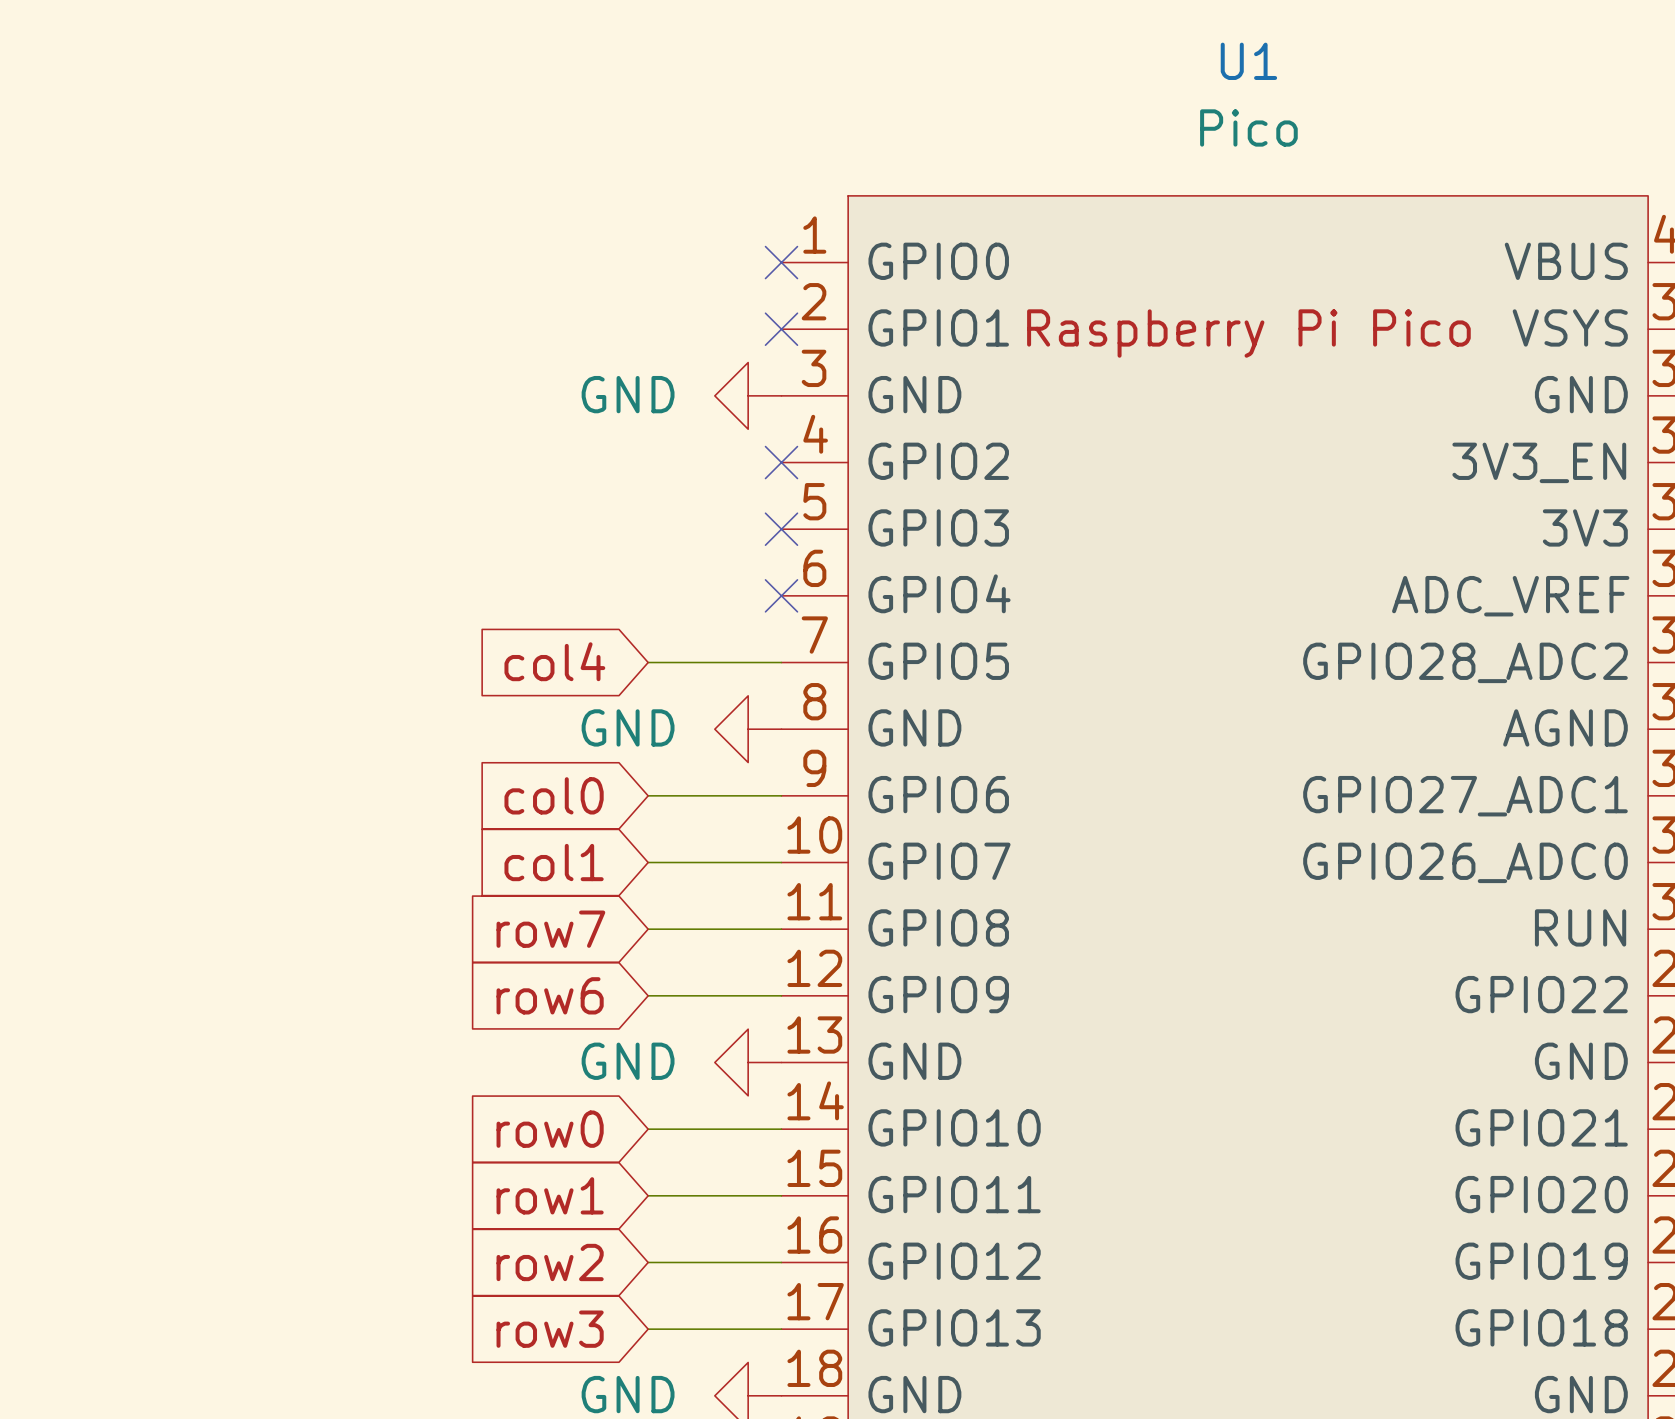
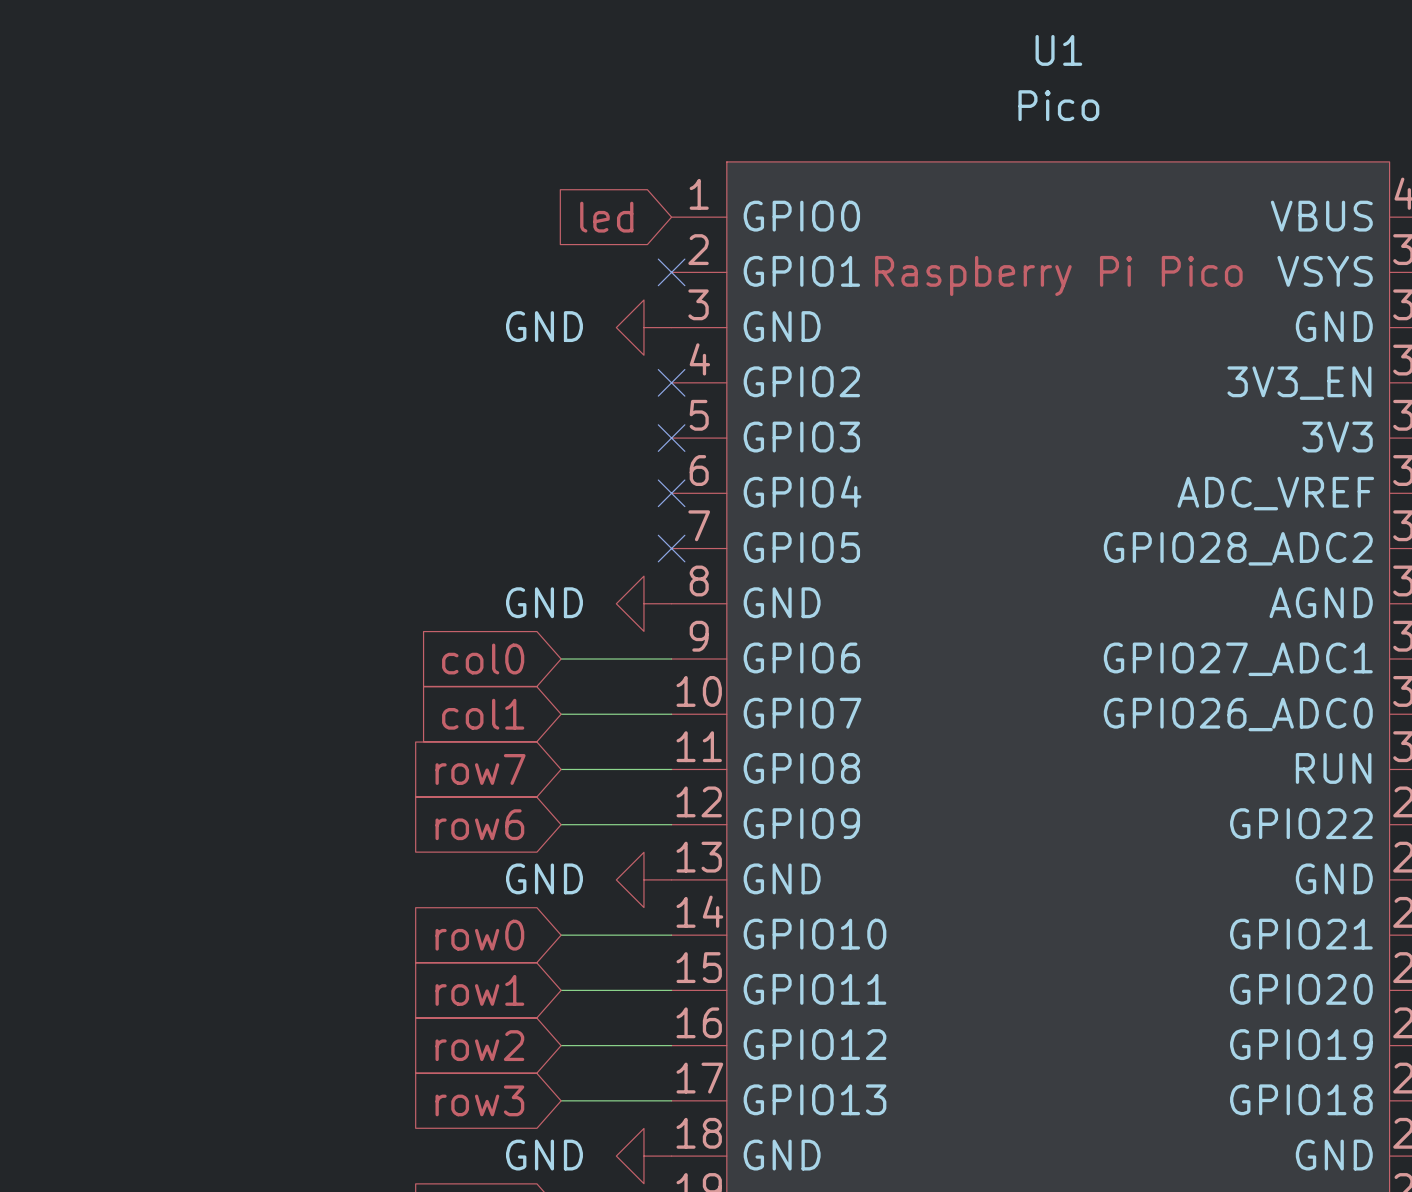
global label: none -> led (606, 217)
no-connect mark: (781, 262) -> none
global label: col4 (554, 661) -> none
wire: (648, 662) (781, 662) -> none
no-connect mark: none -> (671, 548)

